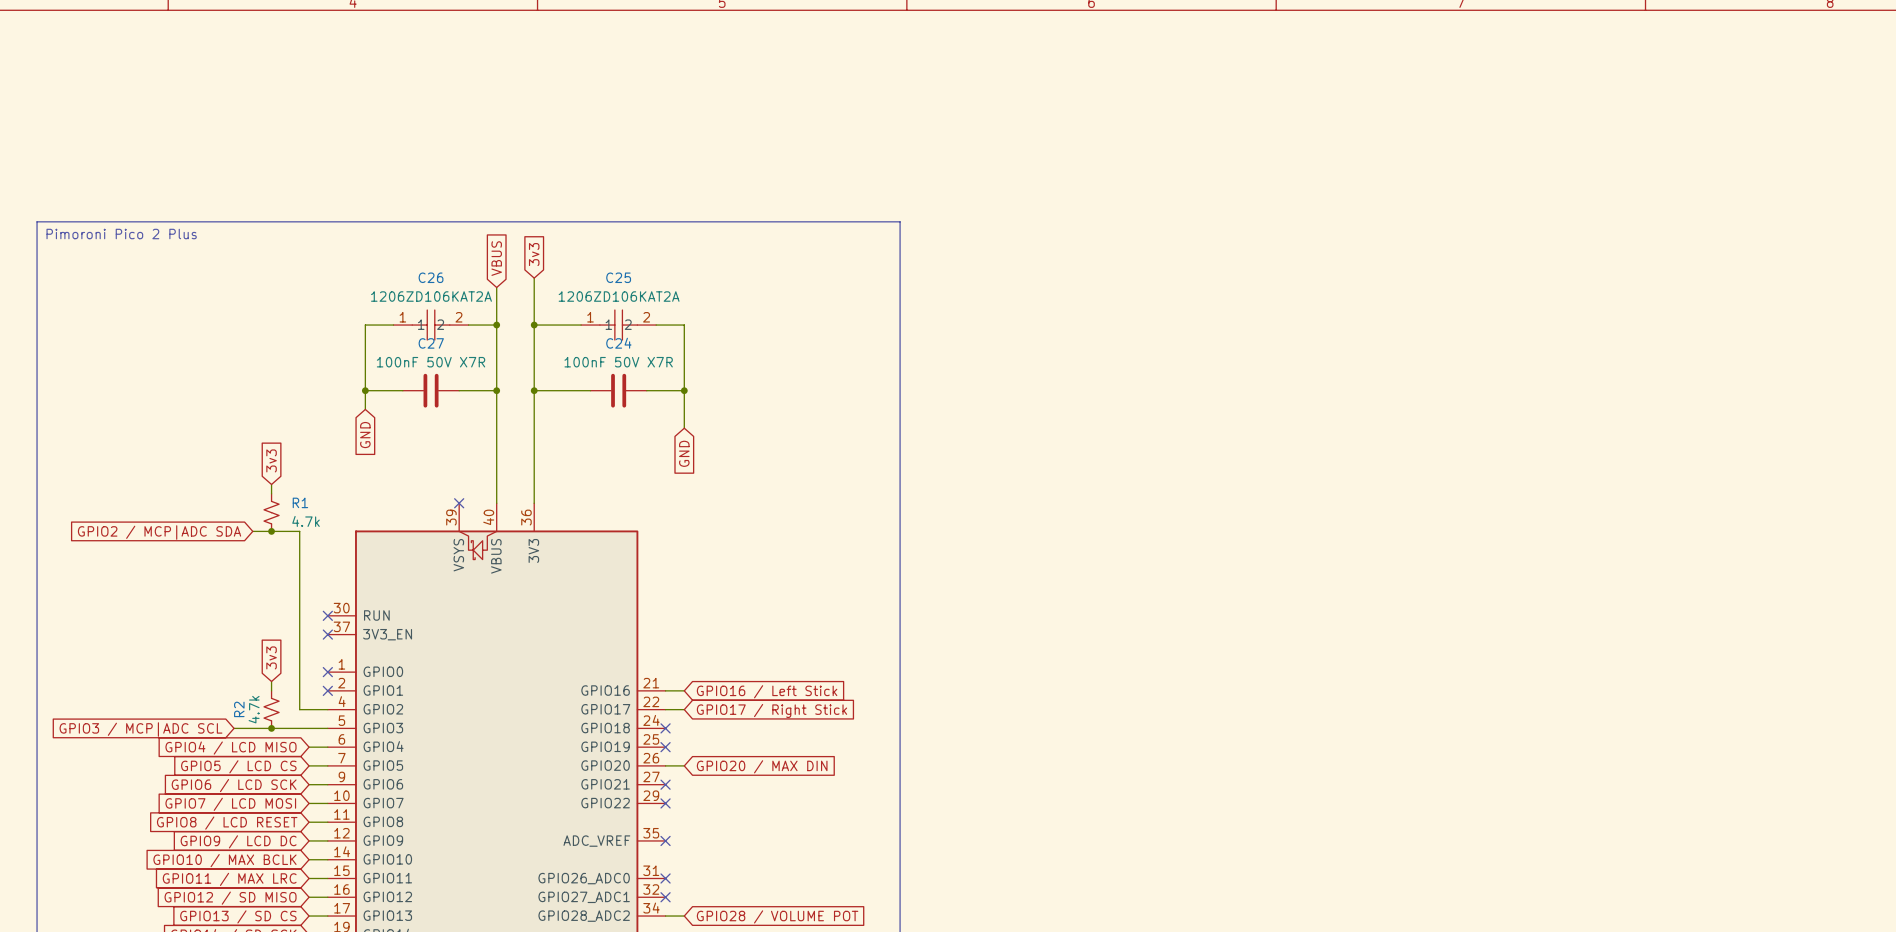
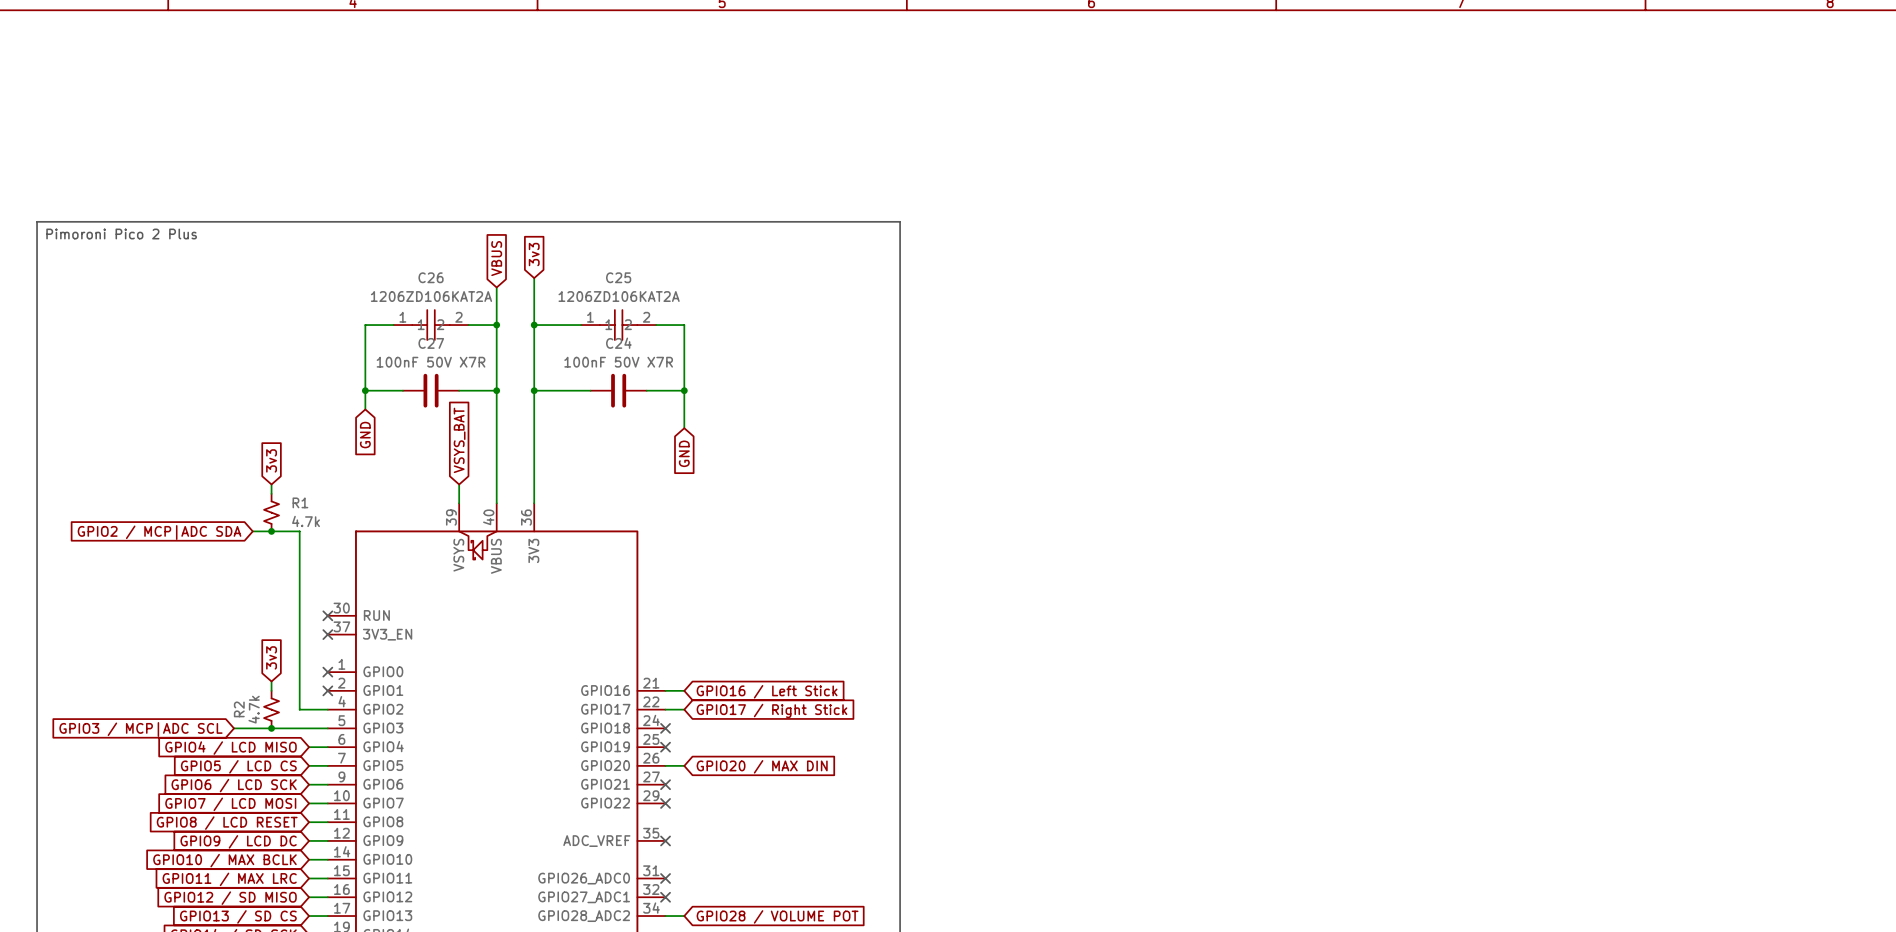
global label: none -> VSYS_BAT (459, 440)
wire: none -> (459, 484) (459, 503)
no-connect mark: (459, 503) -> none

